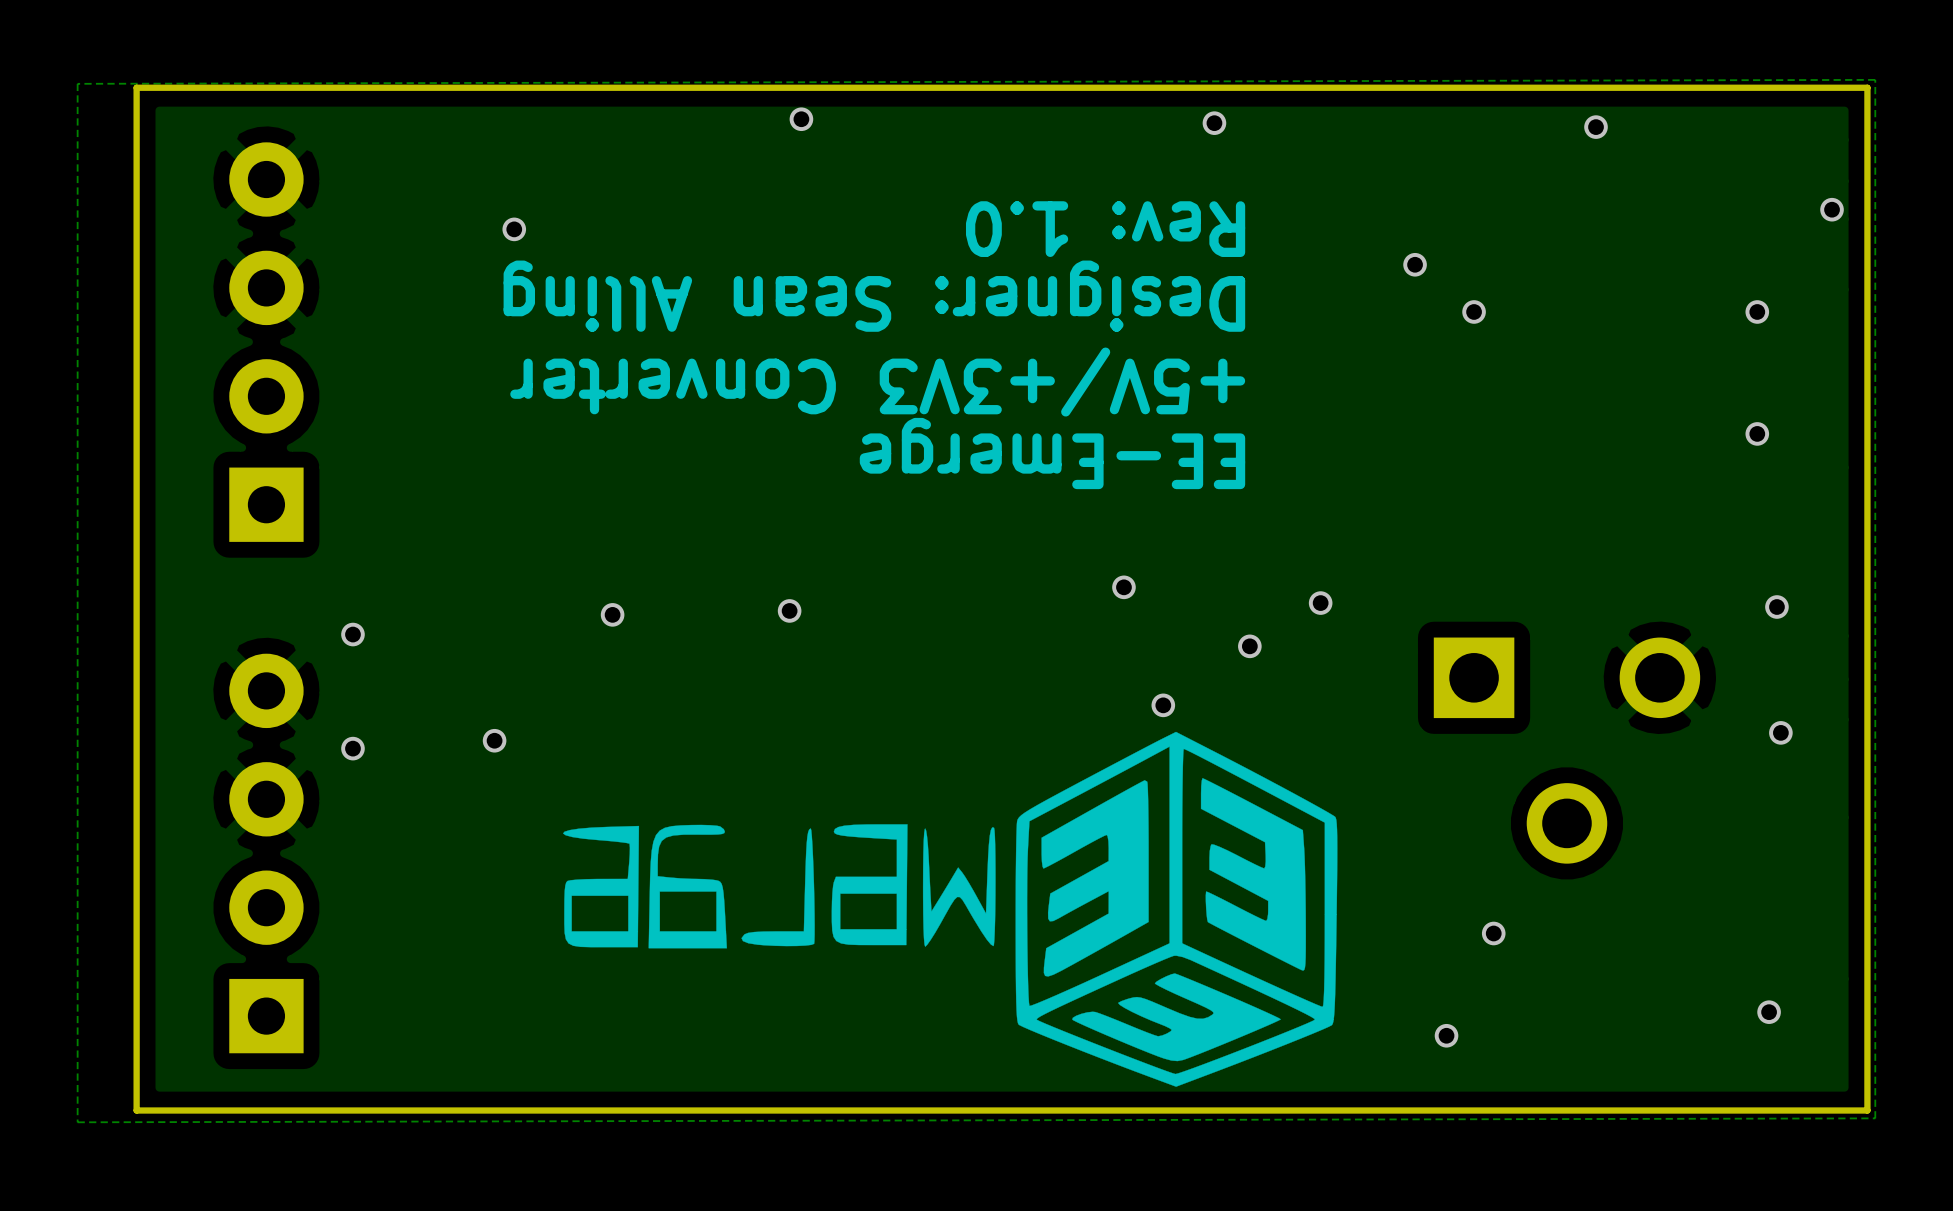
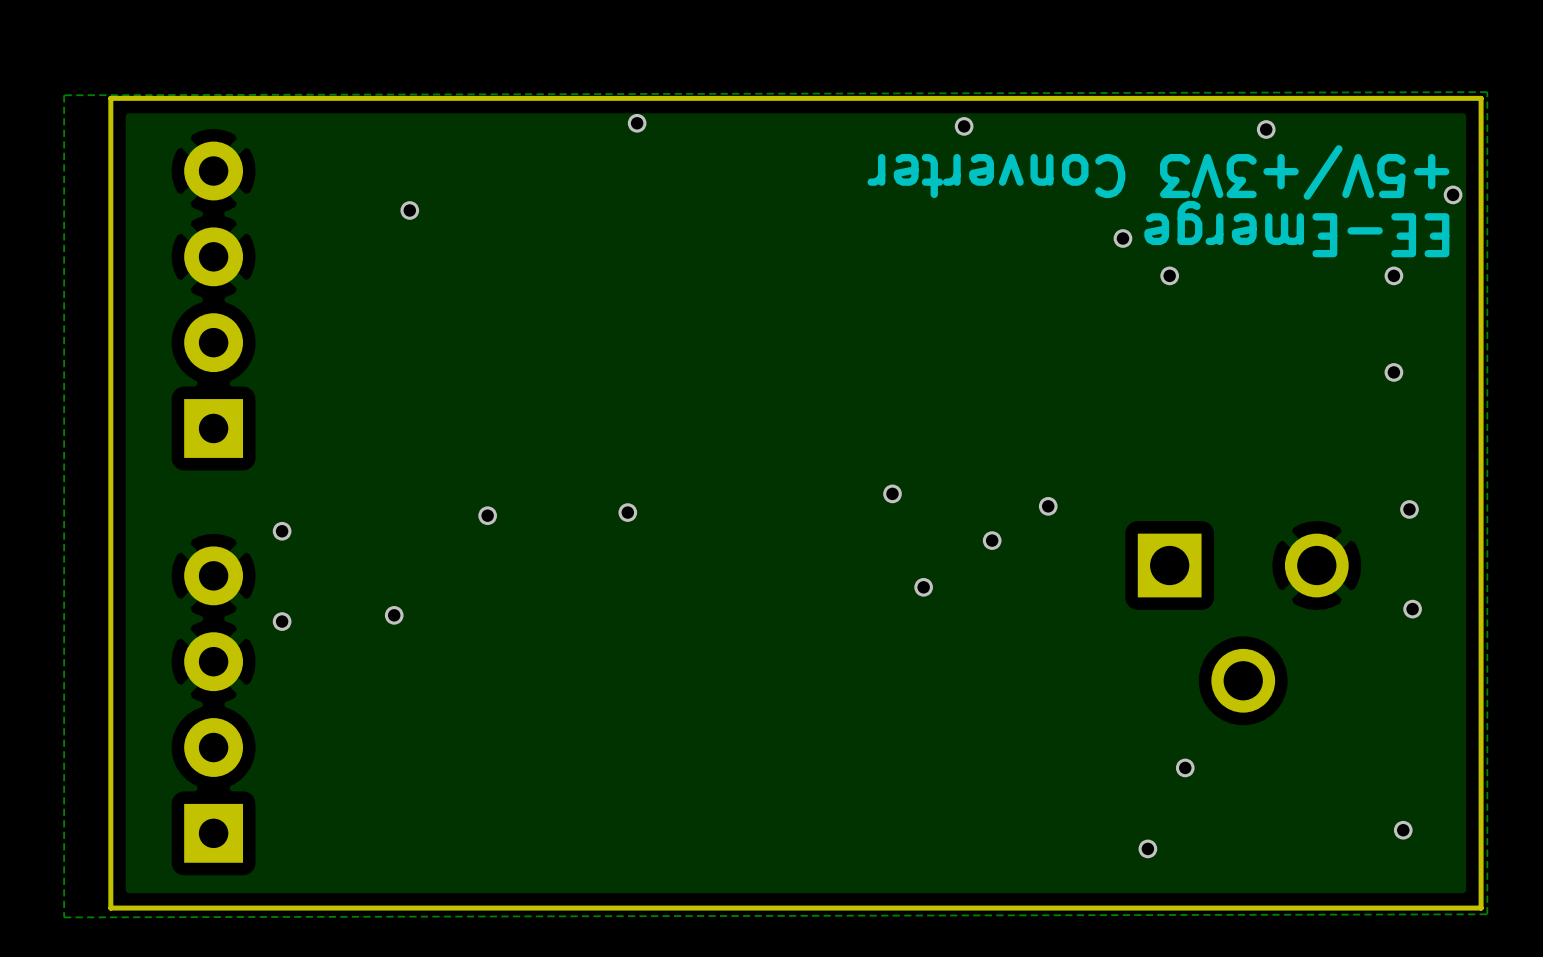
text: Rev: 1.0 (1105, 229) -> none
text: Designer: Sean Alling (874, 296) -> none
text position: +5V/+3V3 Converter (877, 382) -> +5V/+3V3 Converter (1158, 172)
text position: EE-Emerge (1052, 453) -> EE-Emerge (1296, 229)
drawing: [563, 731, 1338, 1087] -> none

